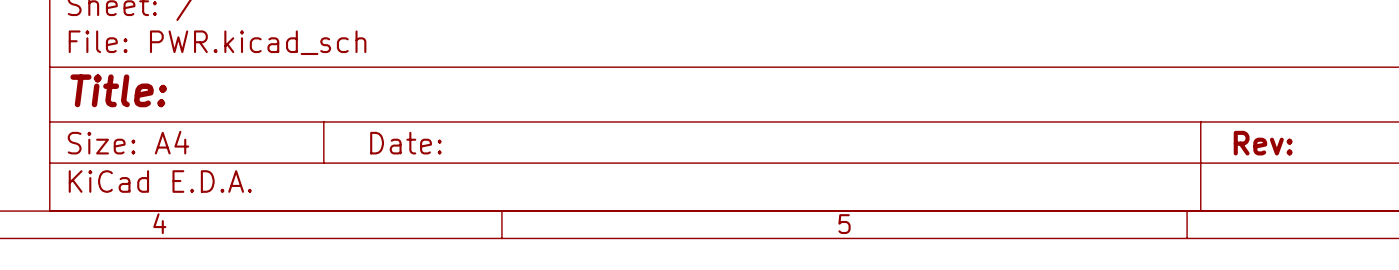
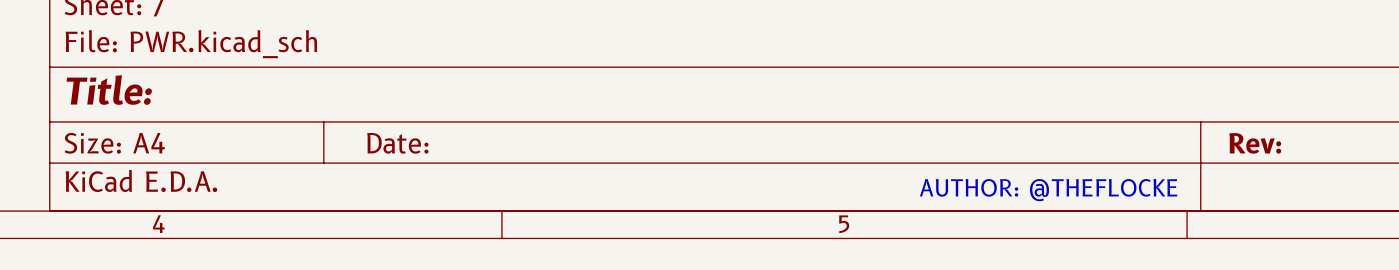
text: none -> AUTHOR: @THEFLOCKE (1048, 190)

